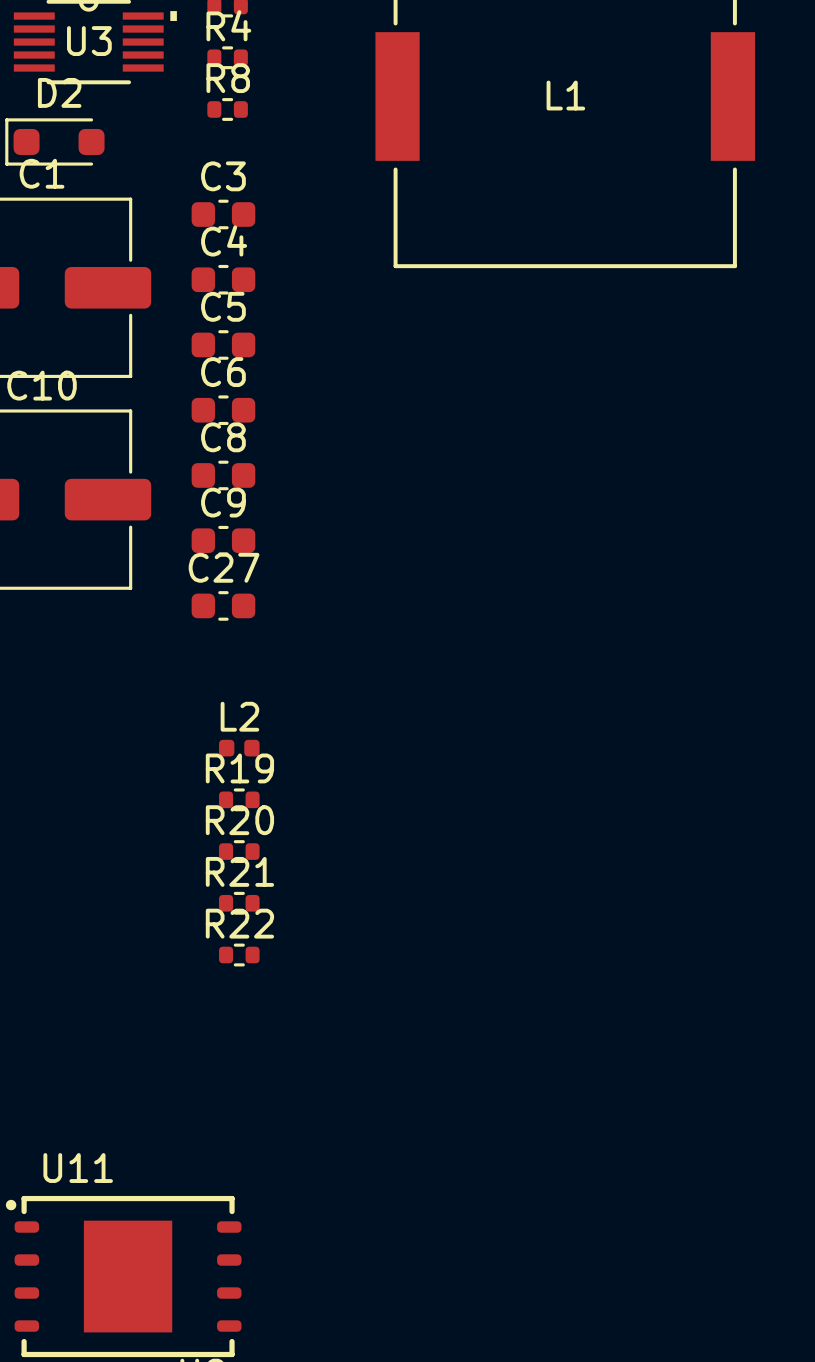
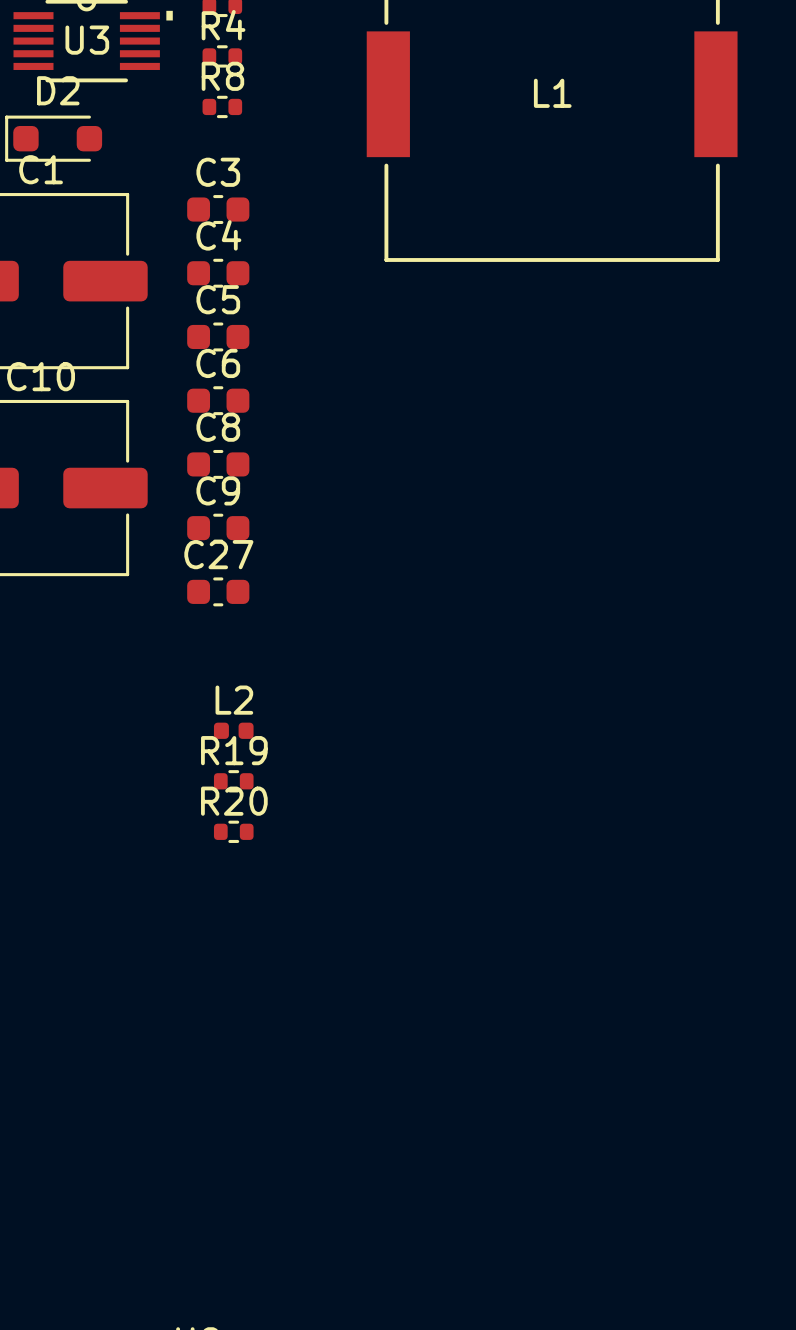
R21: (239, 903) -> none
R22: (239, 955) -> none
U11: (123, 1276) -> none

